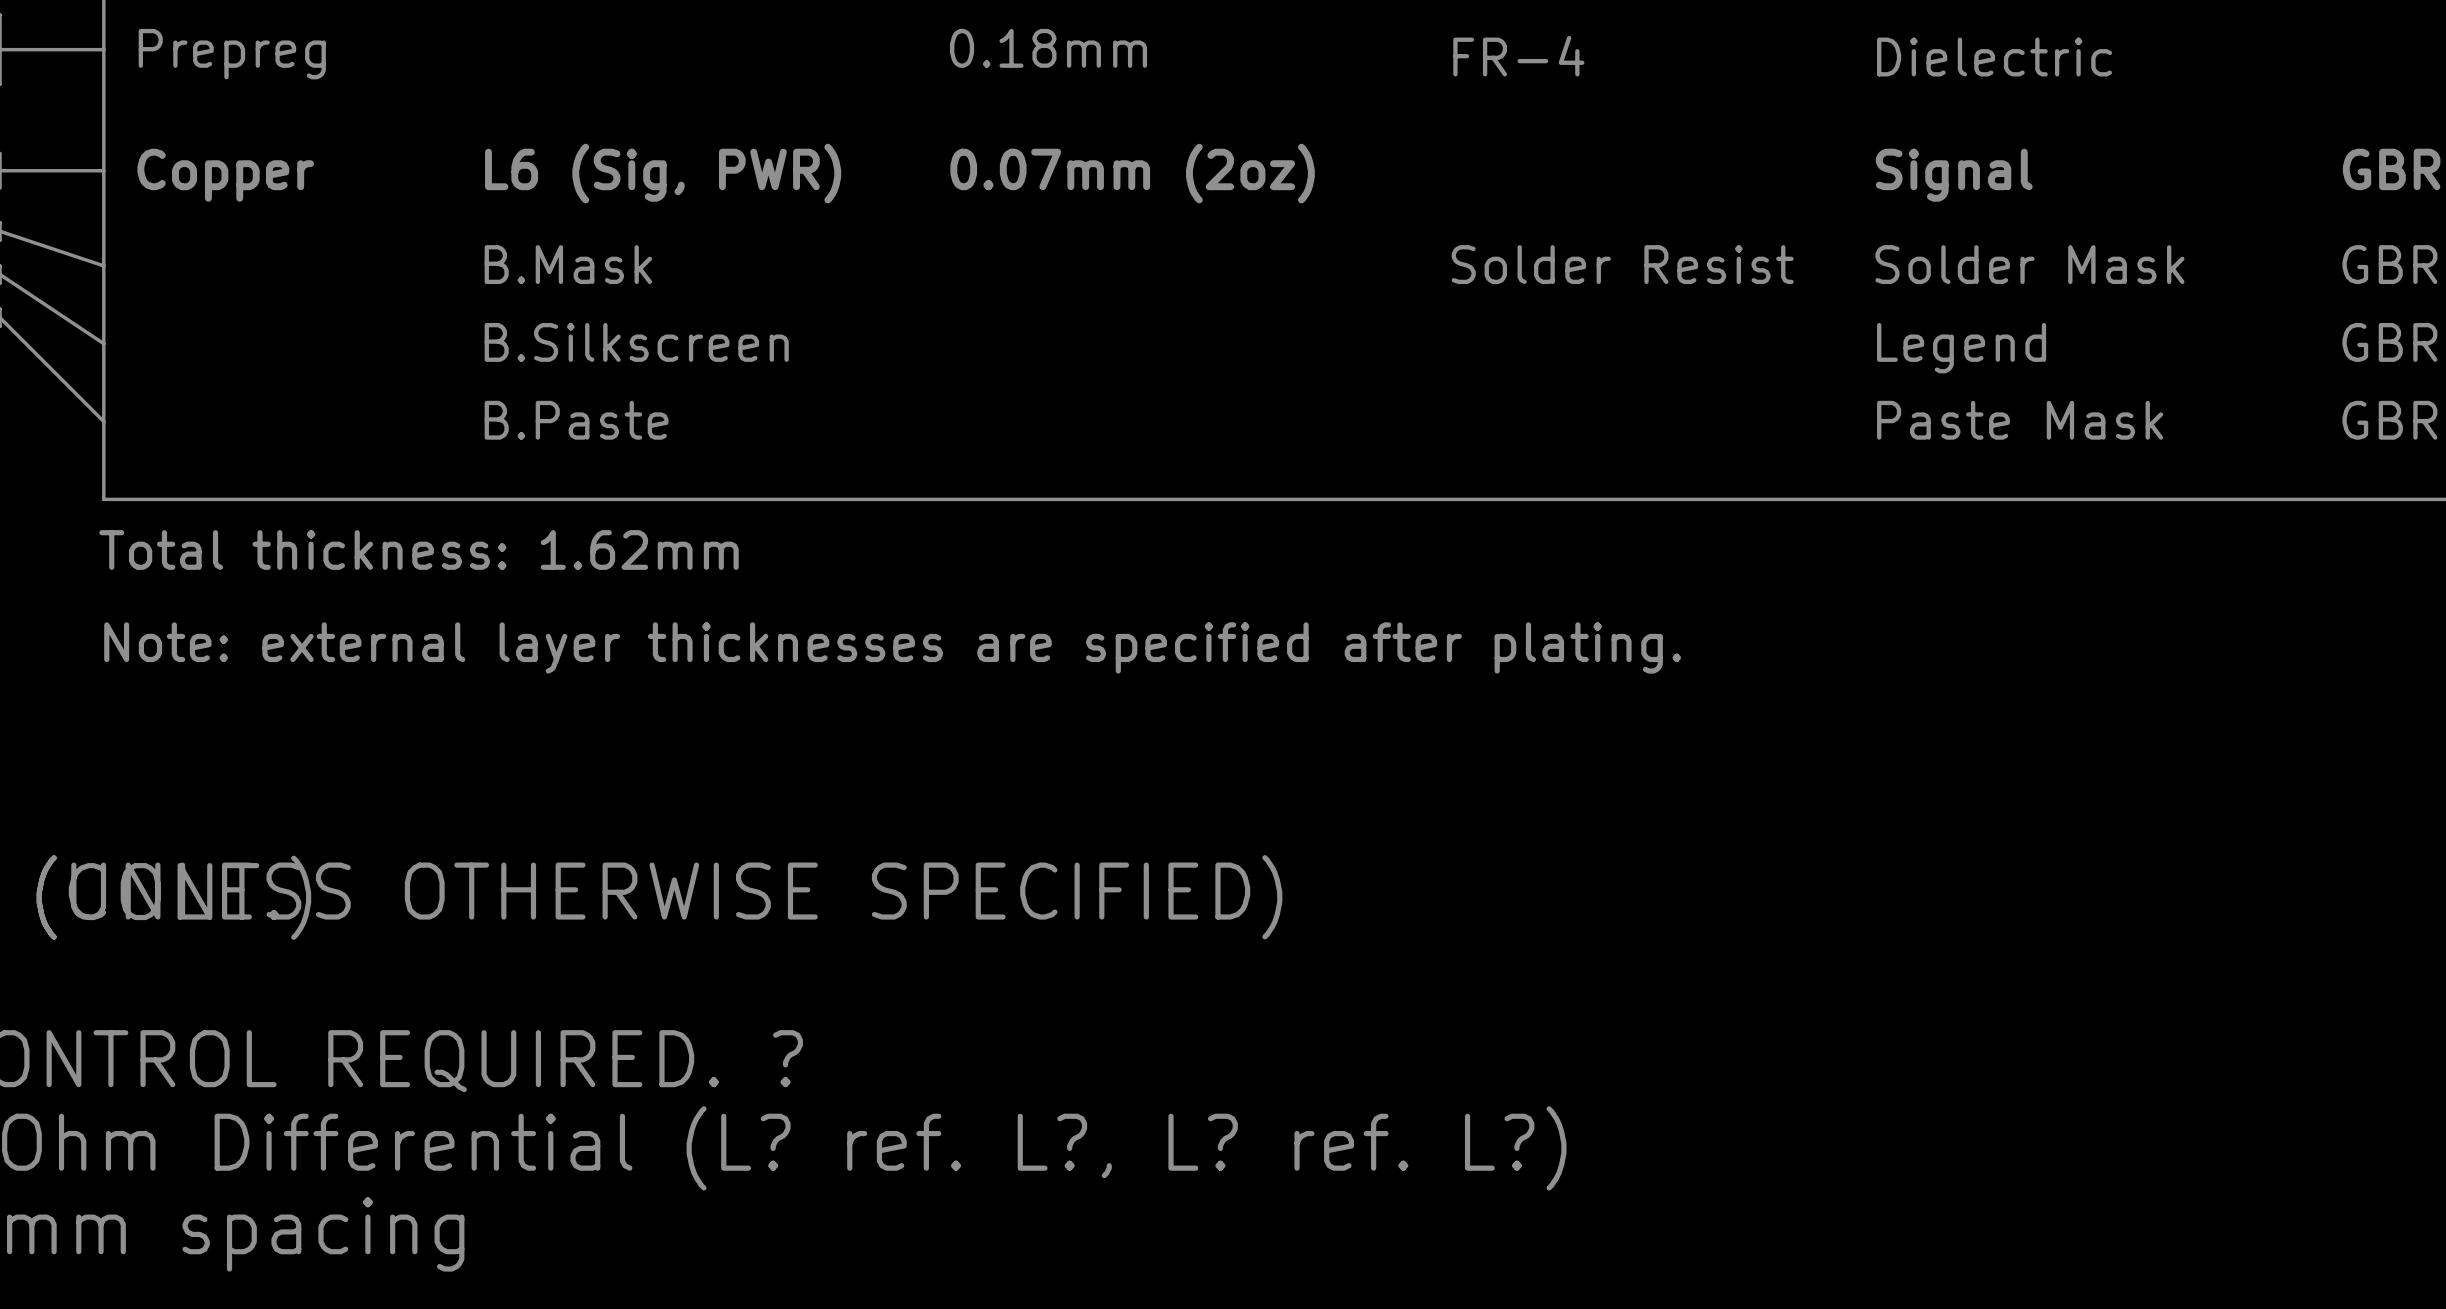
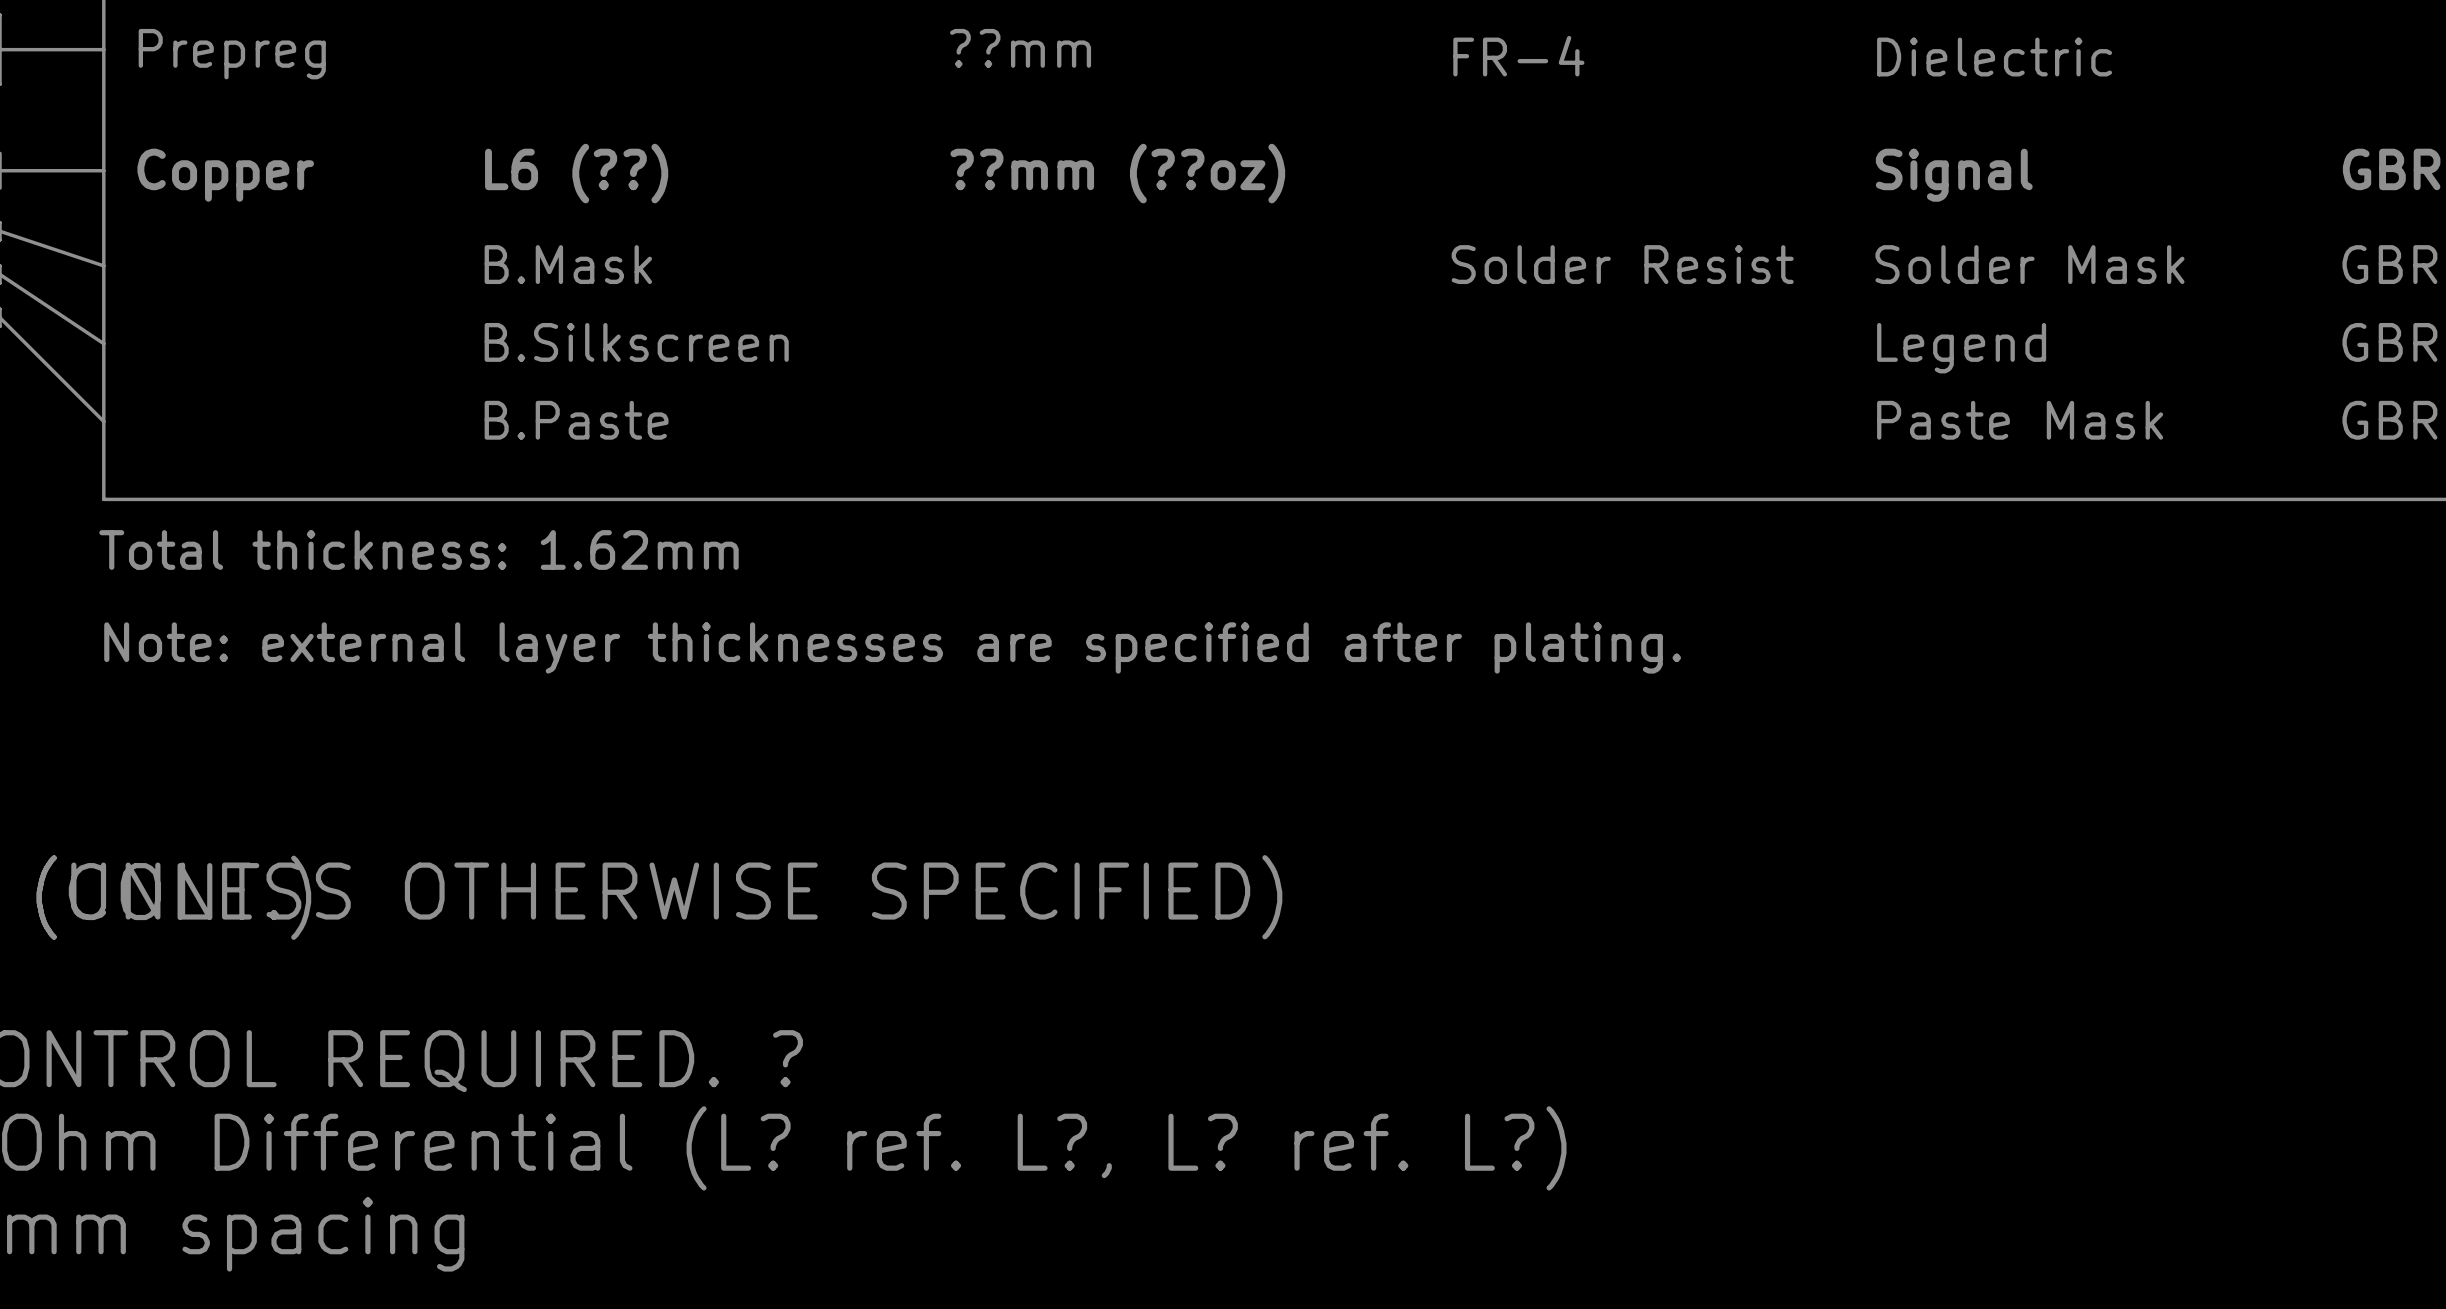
text: 0.18mm (1048, 48) -> ??mm (1020, 48)
text: L6 (Sig, PWR) (663, 173) -> L6 (??) (576, 173)
text: 0.07mm (2oz) (1132, 173) -> ??mm (??oz) (1117, 173)

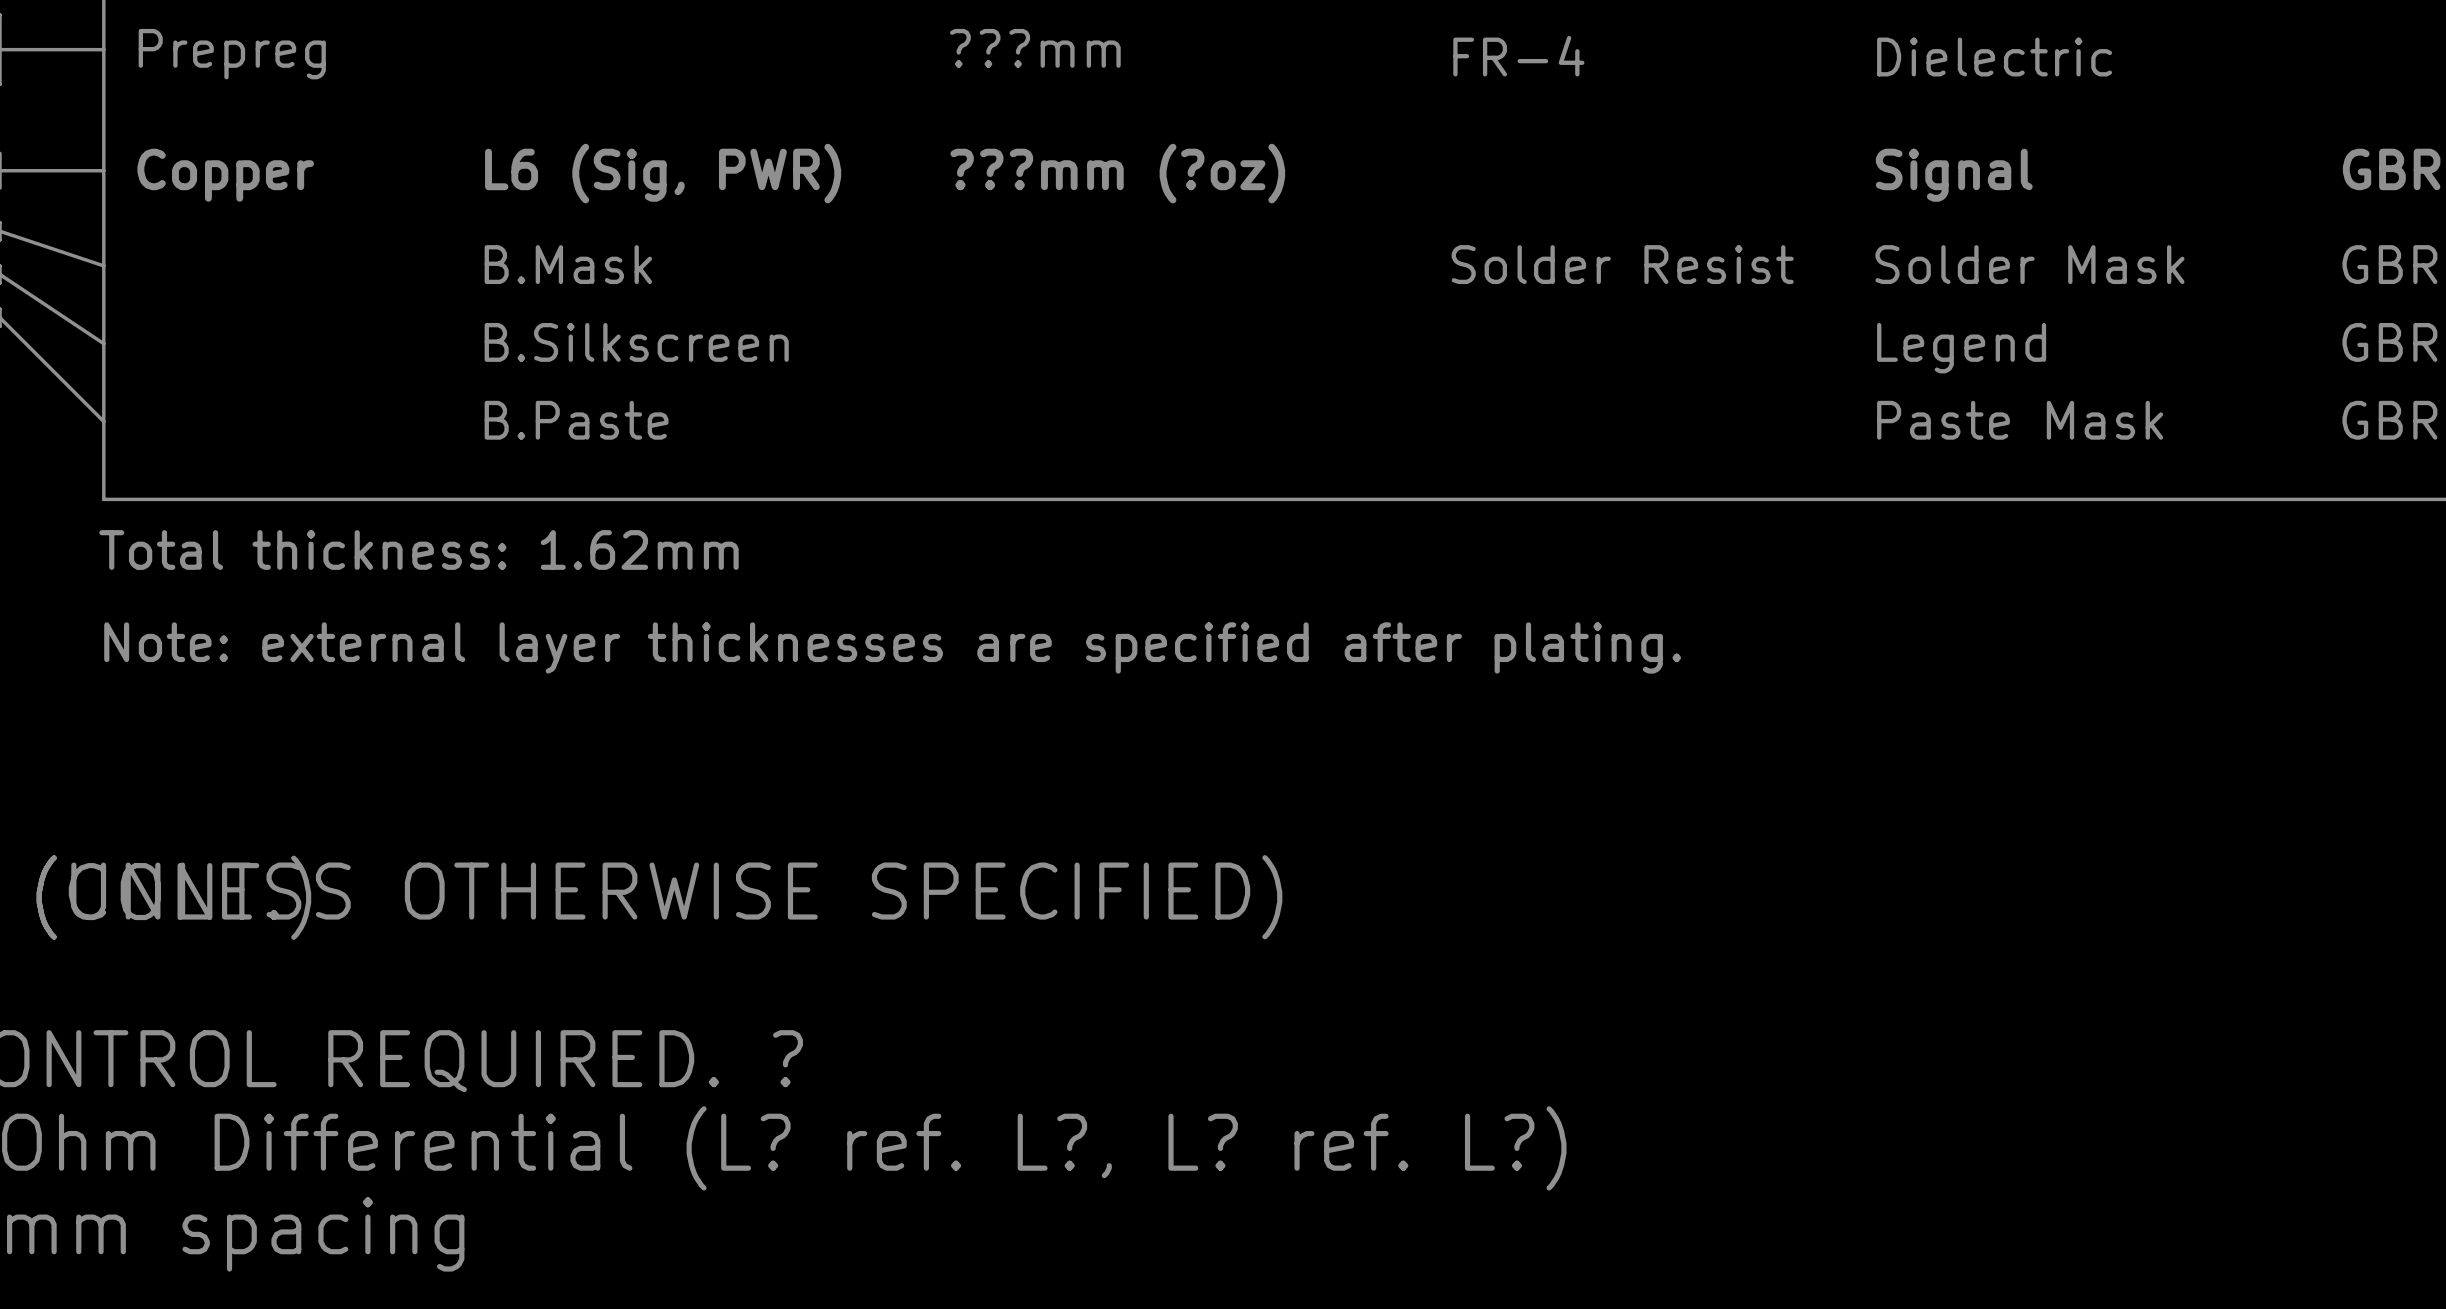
text: ??mm (1020, 48) -> ???mm (1035, 48)
text: L6 (??) (576, 173) -> L6 (Sig, PWR) (663, 173)
text: ??mm (??oz) (1117, 173) -> ???mm (?oz) (1117, 173)

